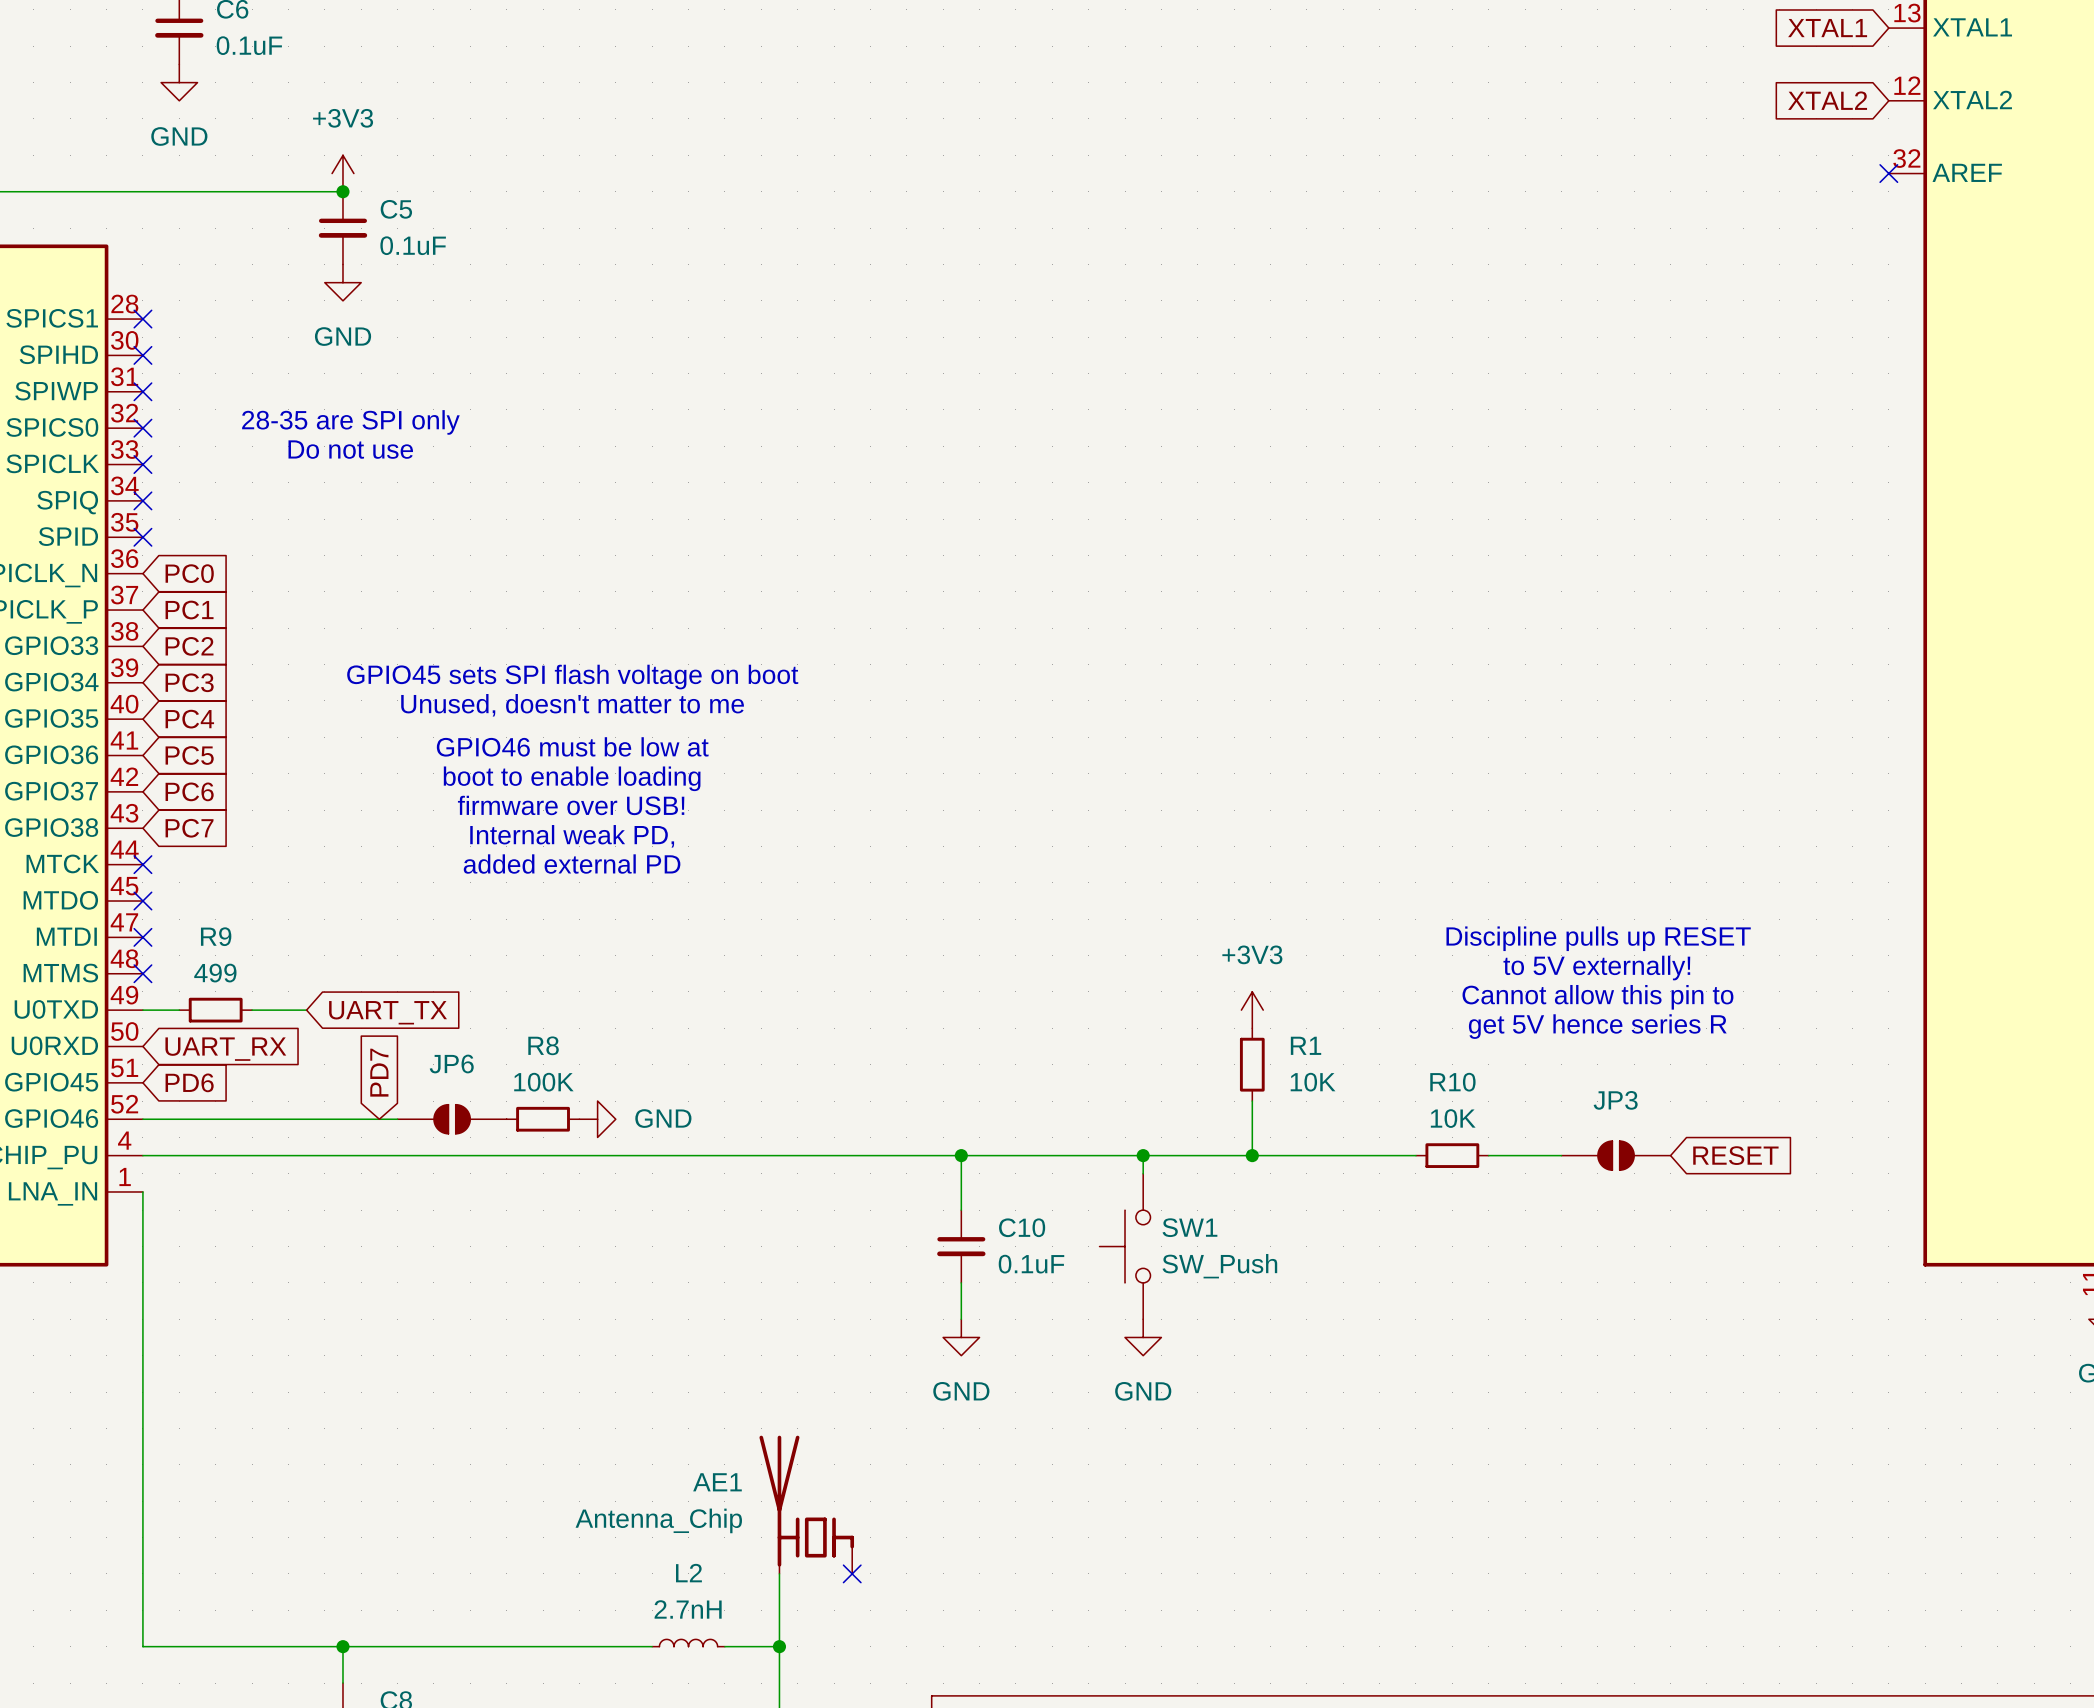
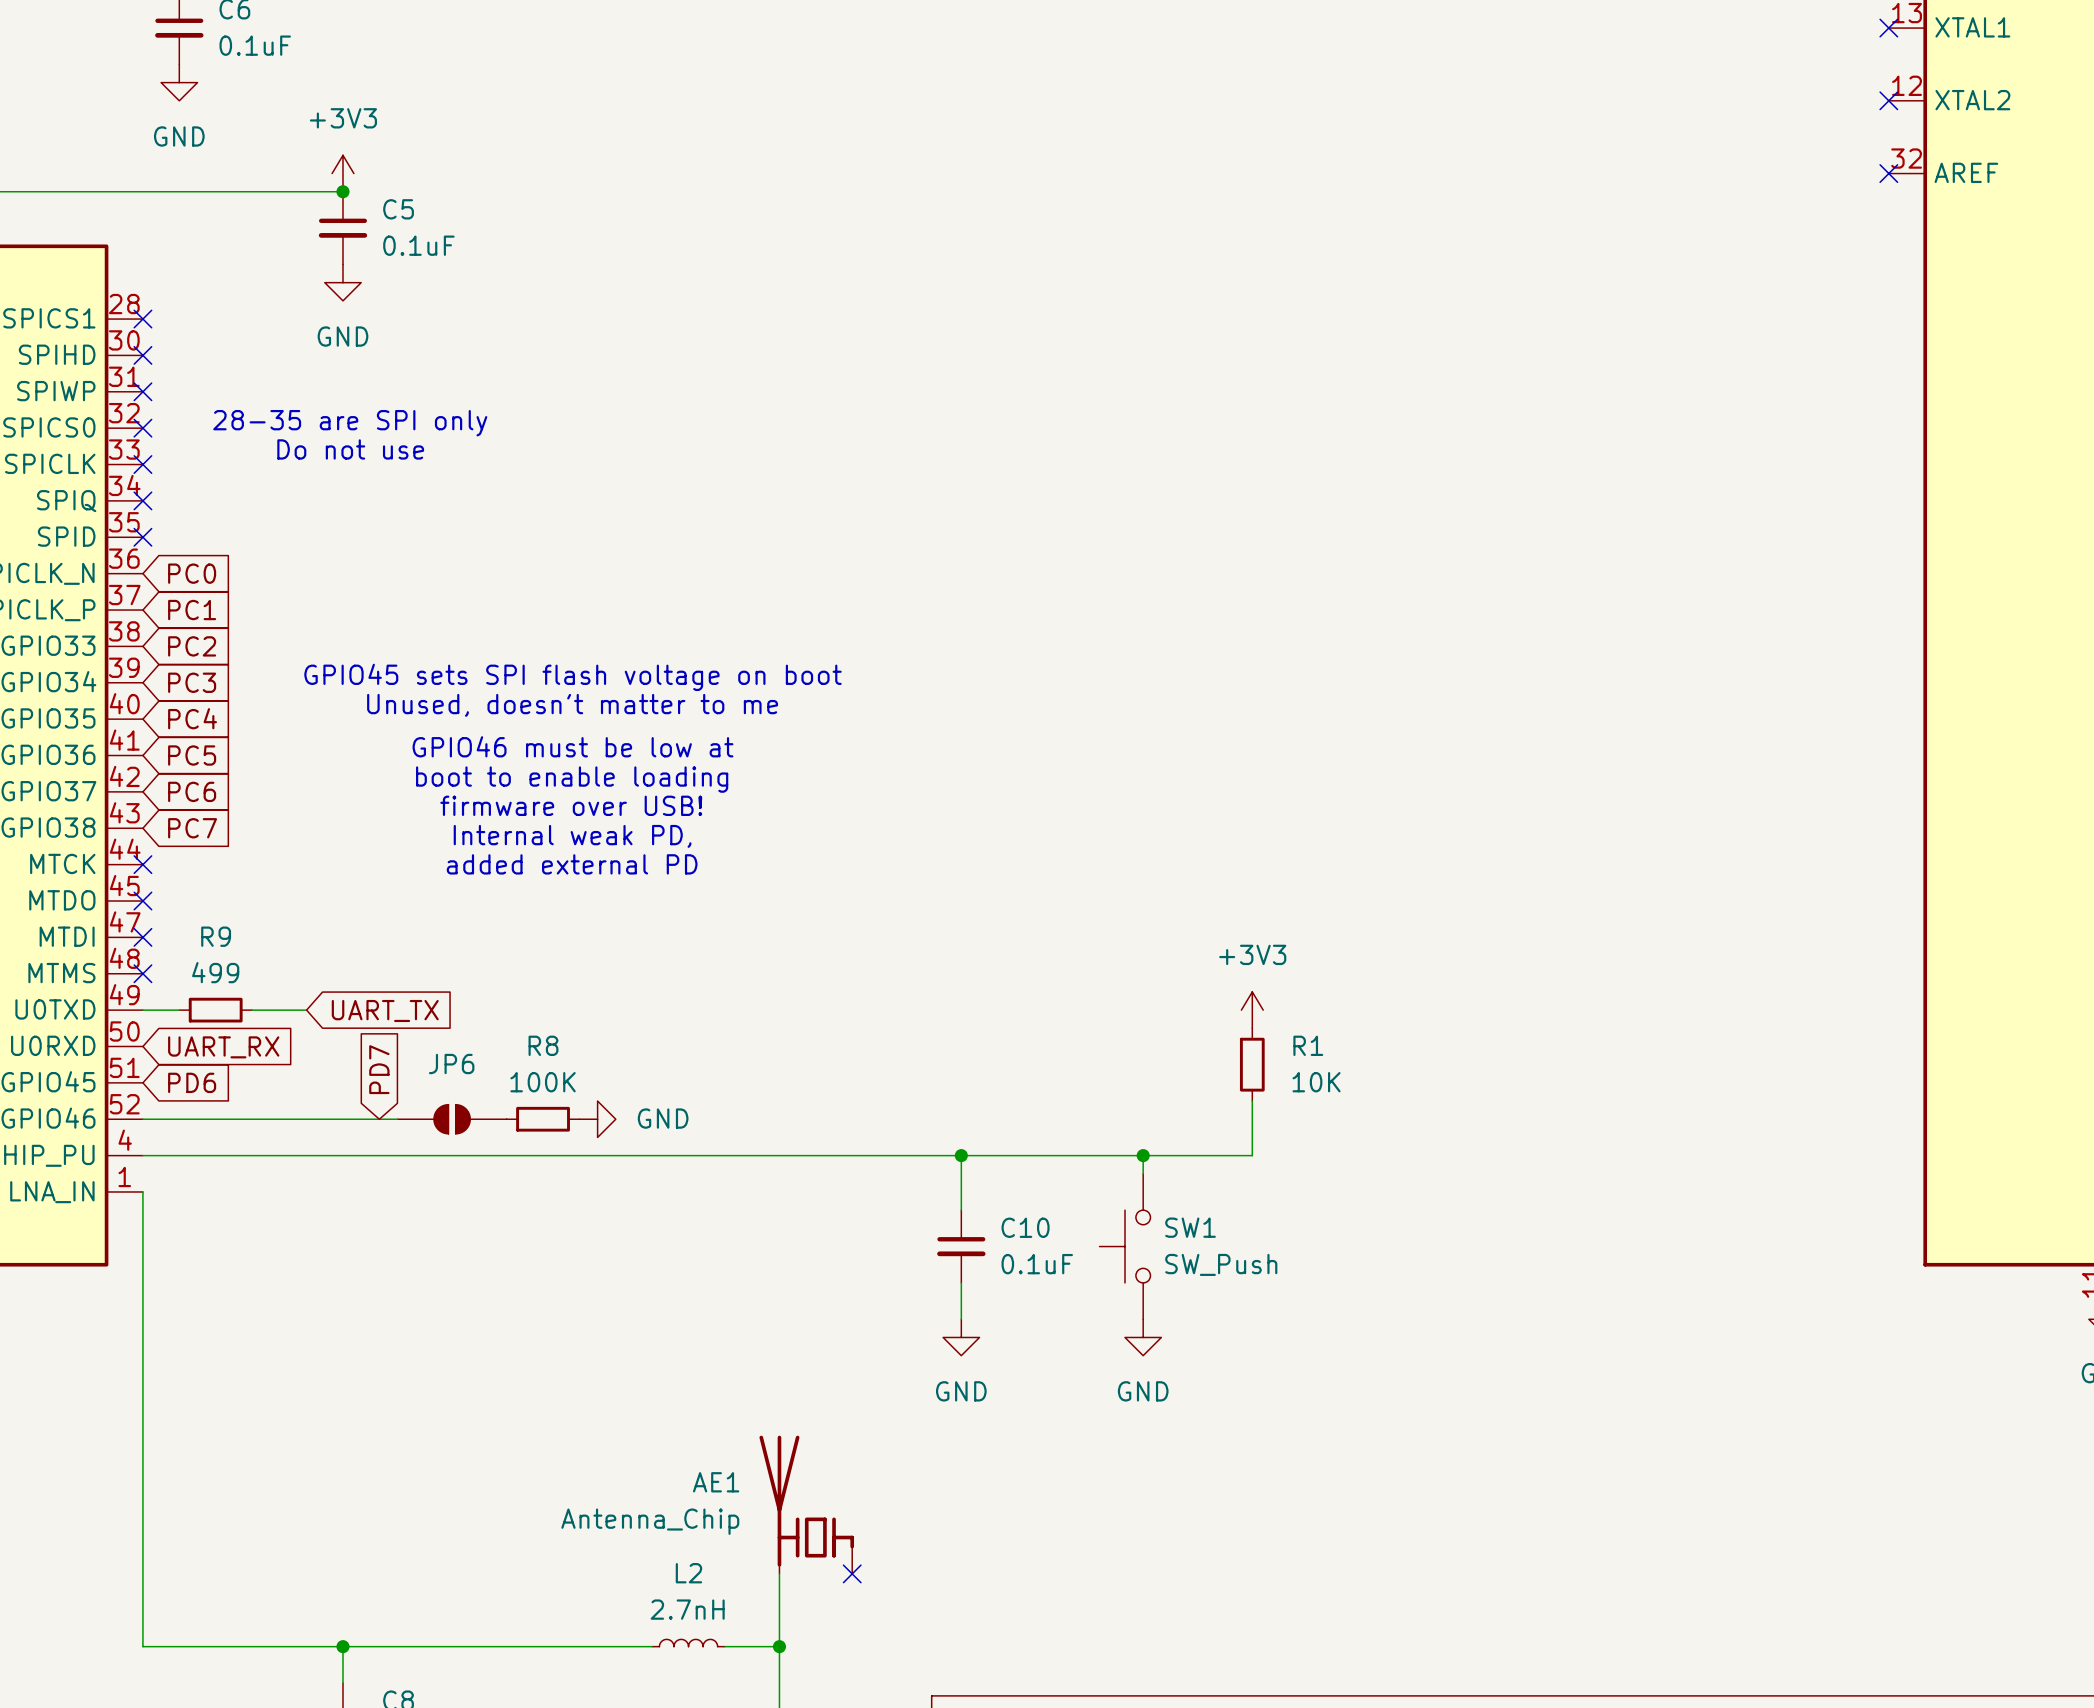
global label: XTAL1 (1827, 28) -> none
no-connect mark: none -> (1888, 28)
global label: XTAL2 (1827, 100) -> none
no-connect mark: none -> (1888, 100)
text: Discipline pulls up RESET (1598, 938) -> none
text: to 5V externally! (1596, 968) -> none
text: Cannot allow this pin to (1597, 997) -> none
text: get 5V hence series R (1597, 1026) -> none
wire: (1252, 1155) (1415, 1155) -> none
junction: (1252, 1155) -> none
R10: 10K (1452, 1155) -> none
wire: (1488, 1155) (1561, 1155) -> none
JP3: (1616, 1155) -> none
global label: RESET (1735, 1155) -> none

